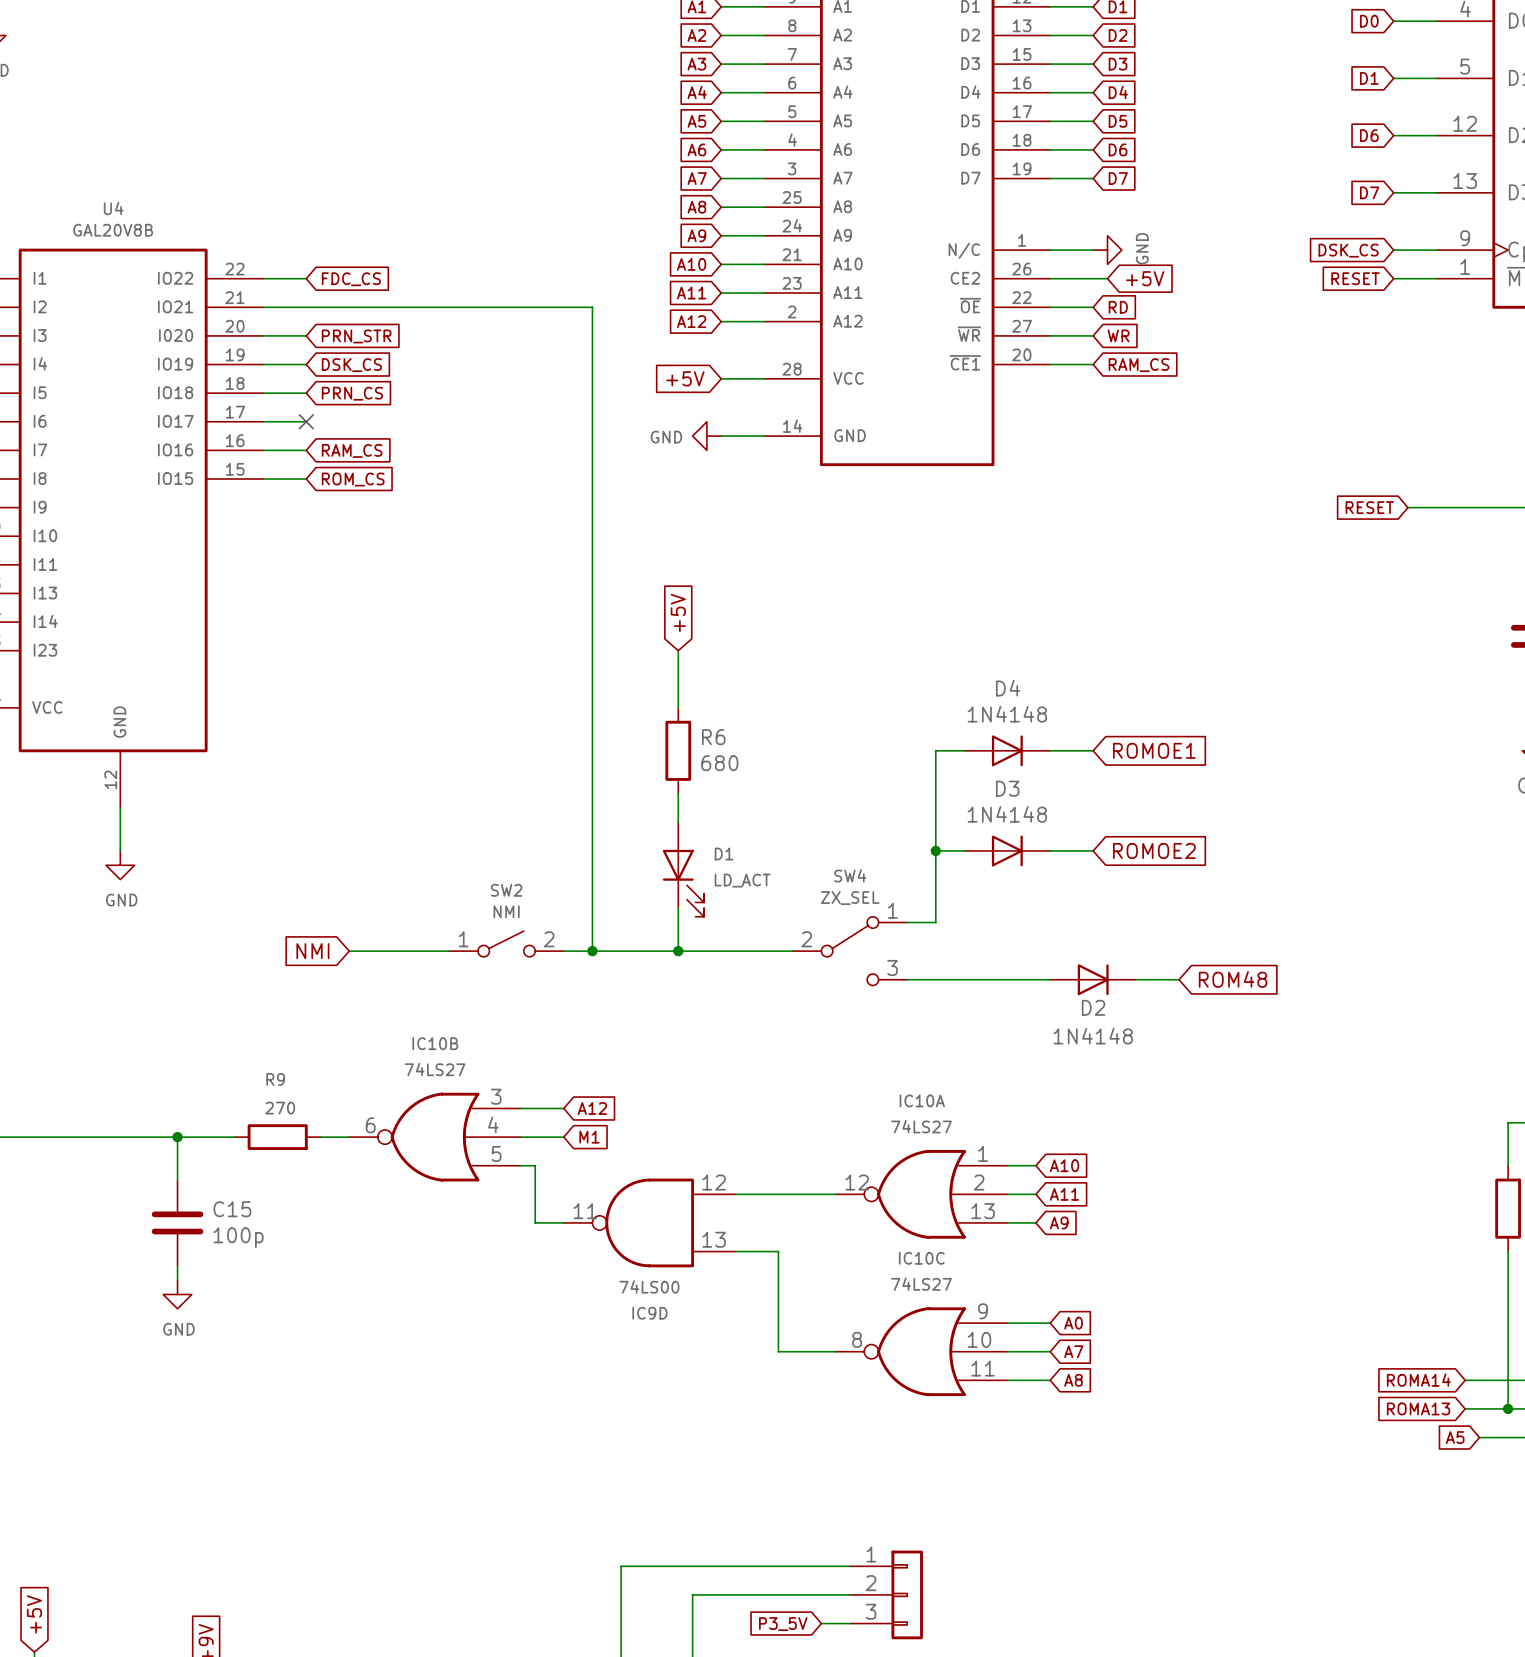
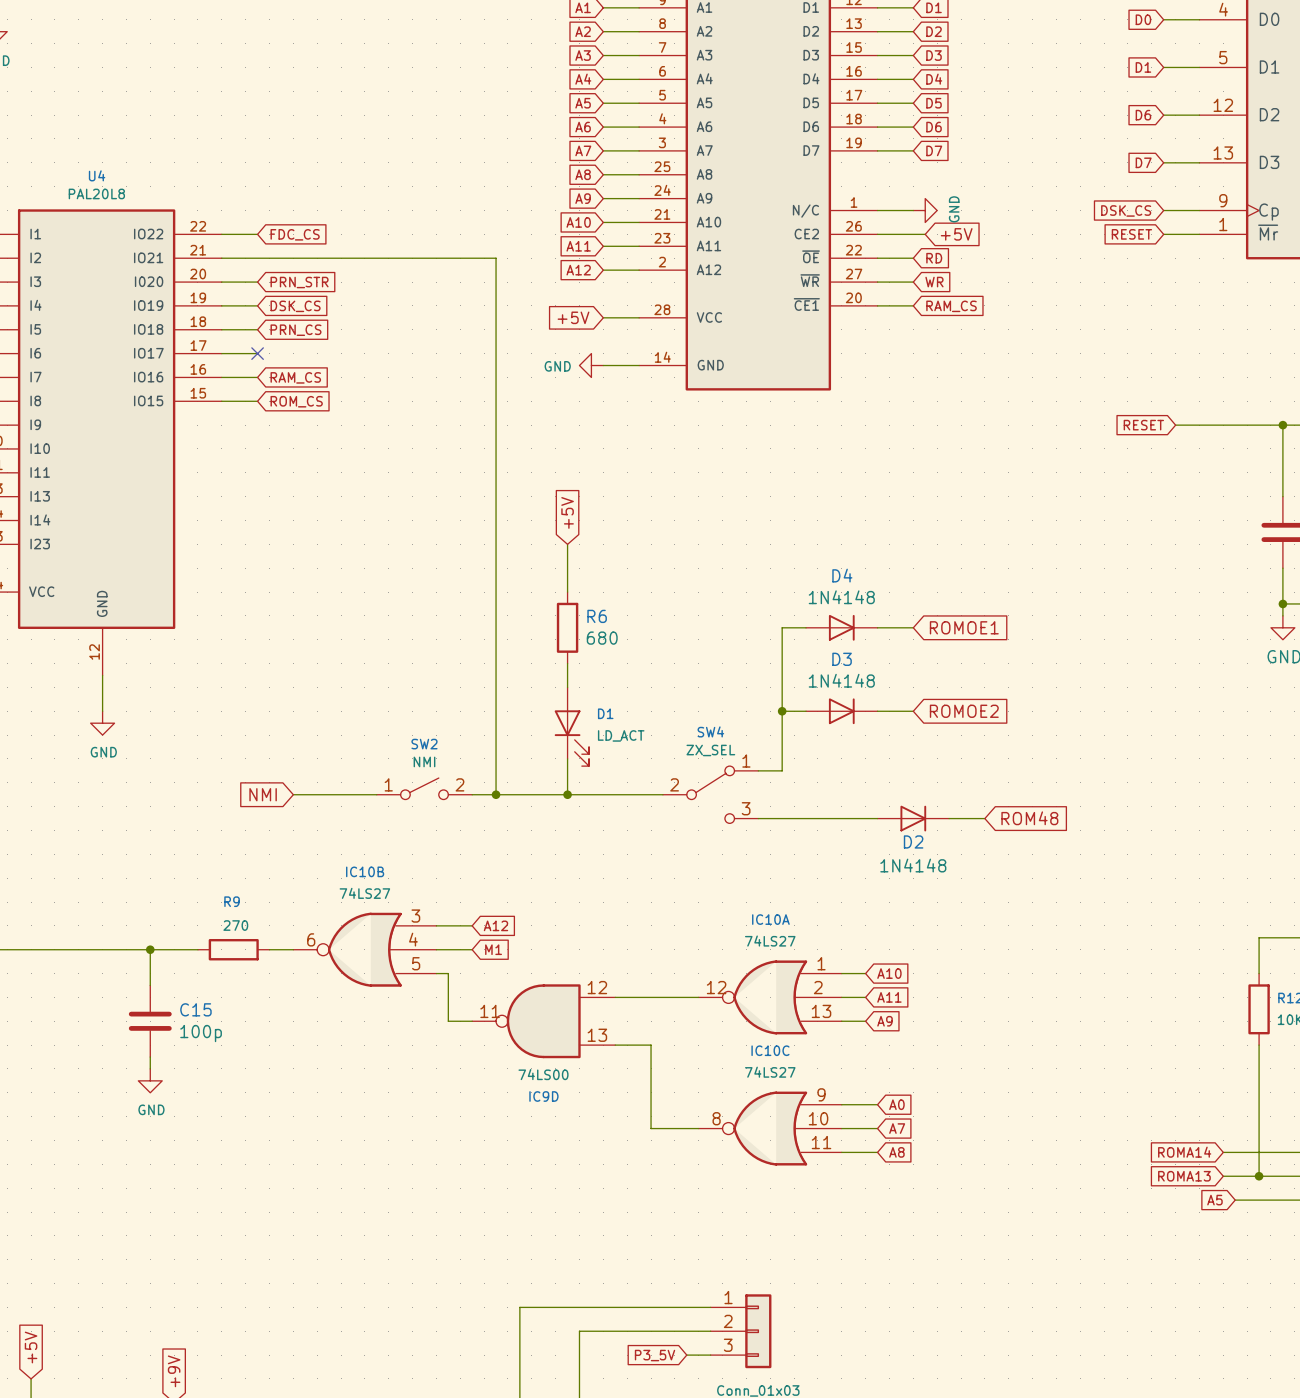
U4 value: GAL20V8B (113, 230) -> PAL20L8 (96, 193)

